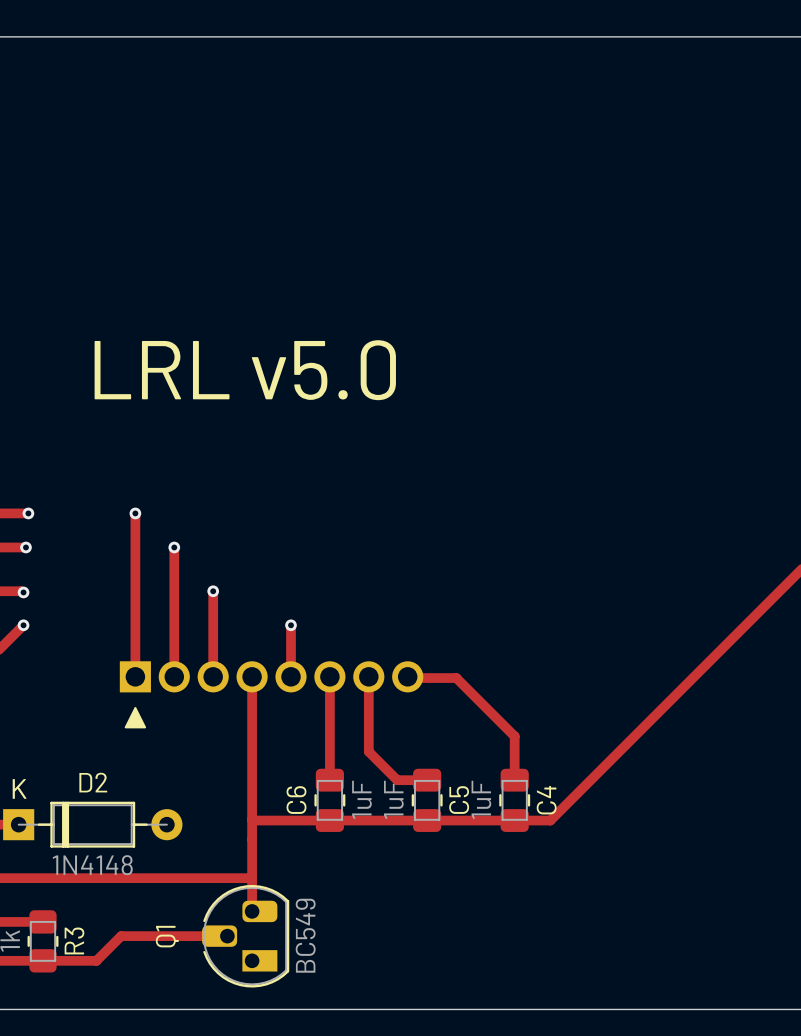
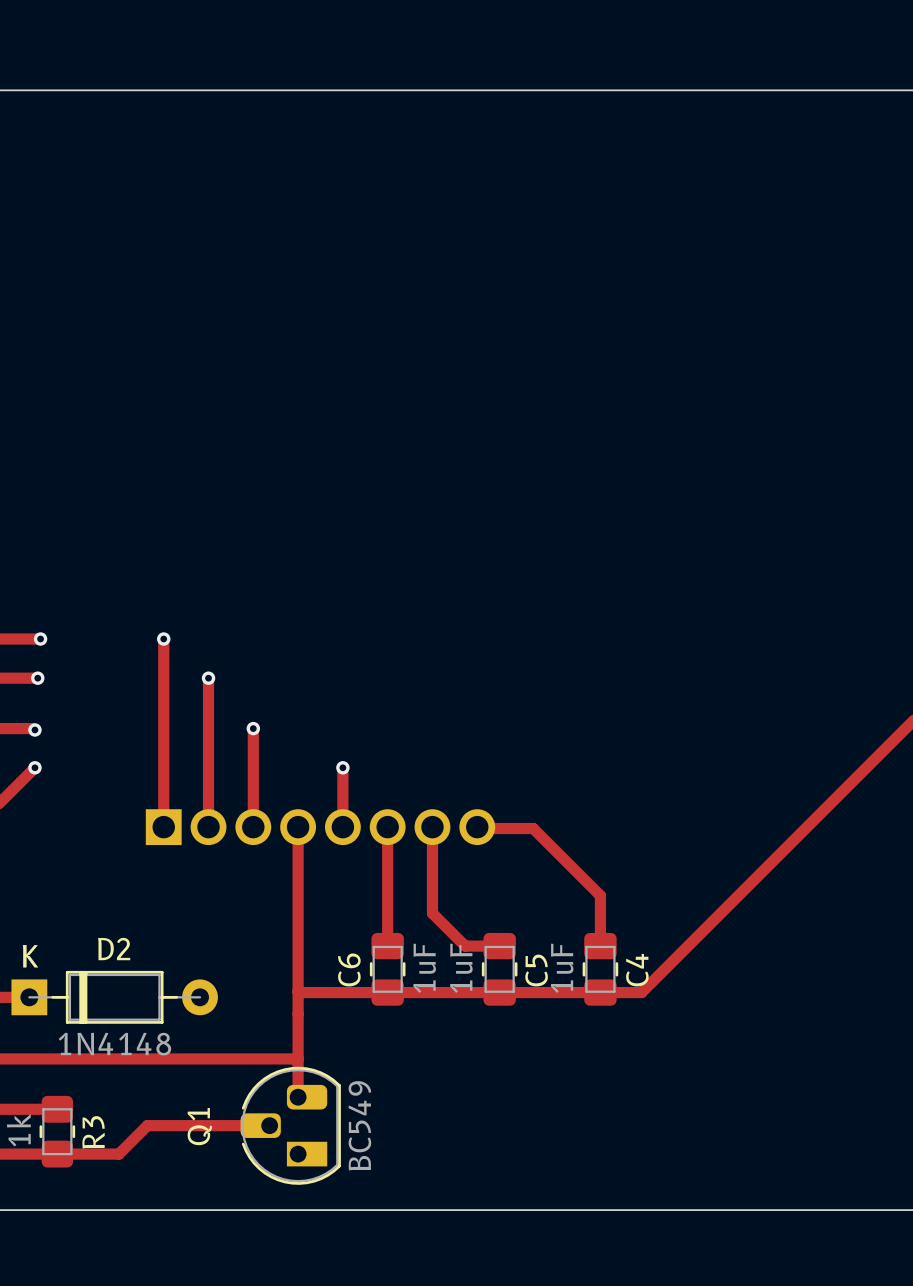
text: LRL v5.0 (245, 370) -> none
drawing: [124, 706, 147, 729] -> none

